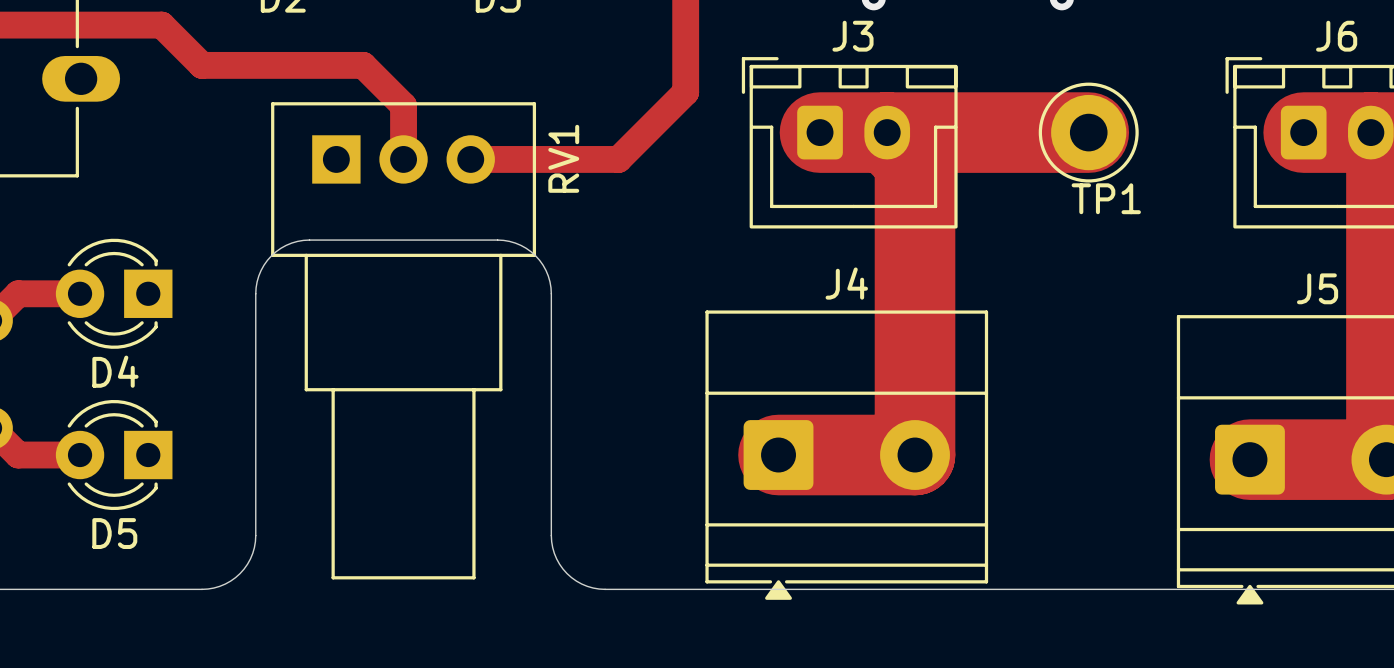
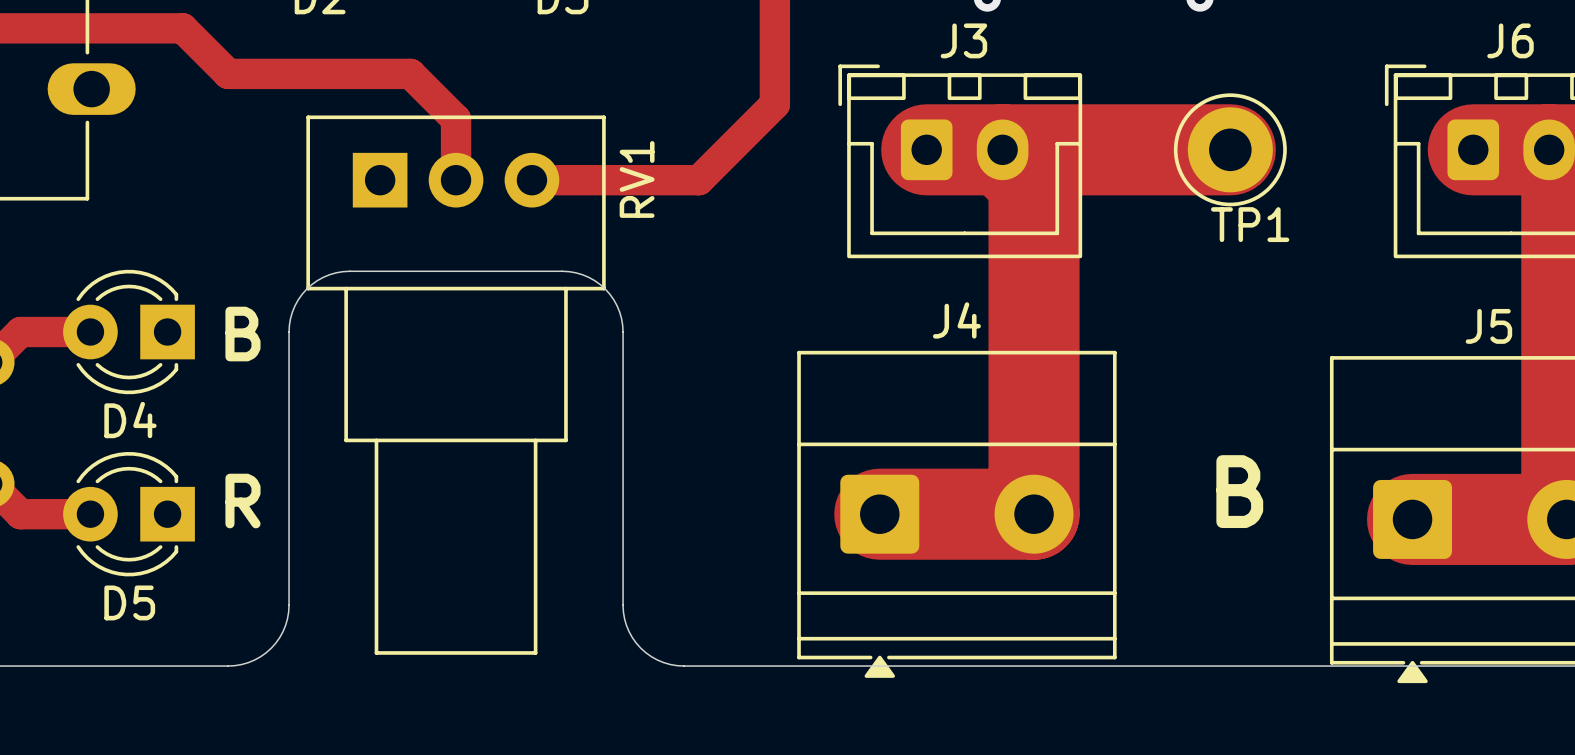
text: none -> B (242, 334)
text: none -> B (1239, 491)
text: none -> R (242, 501)

